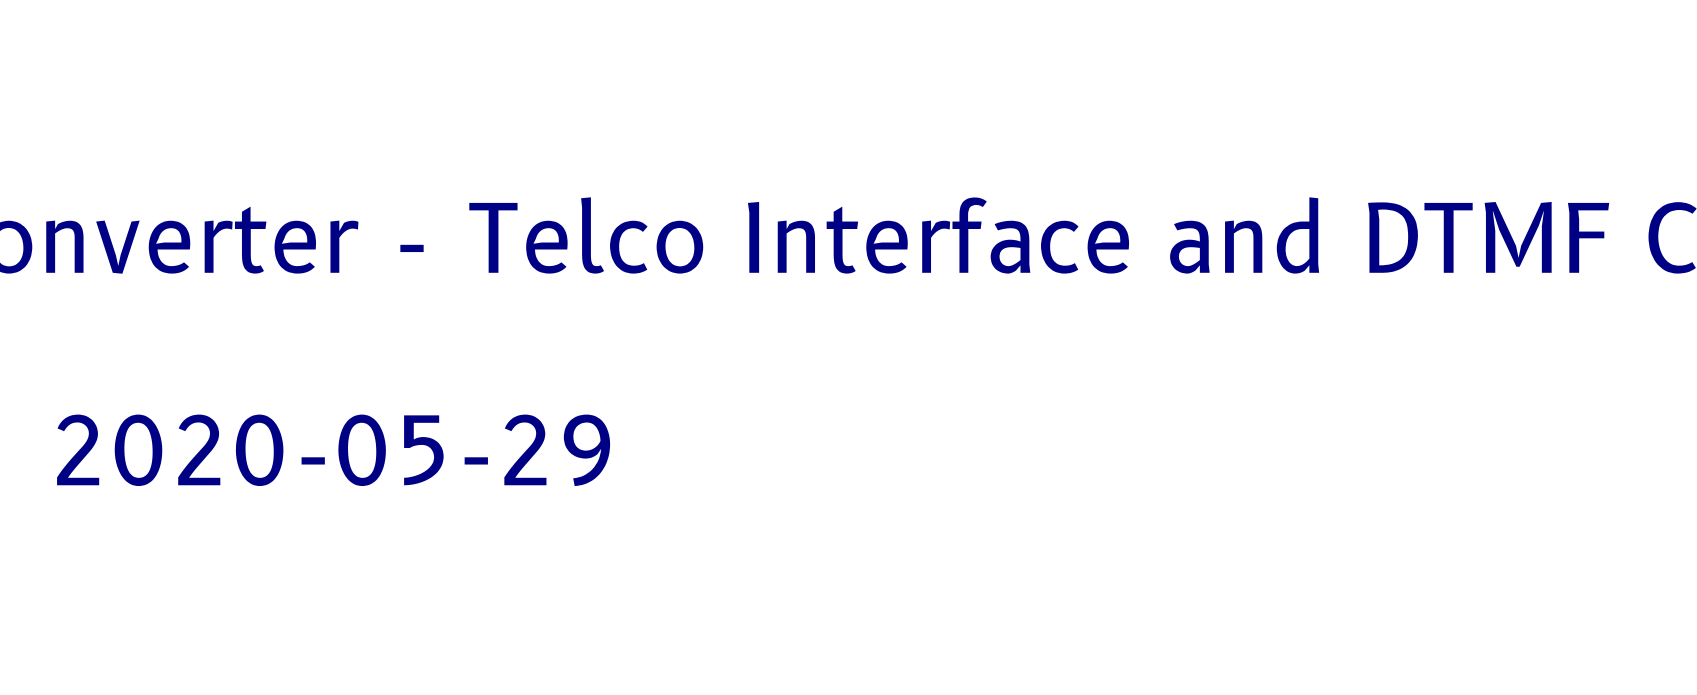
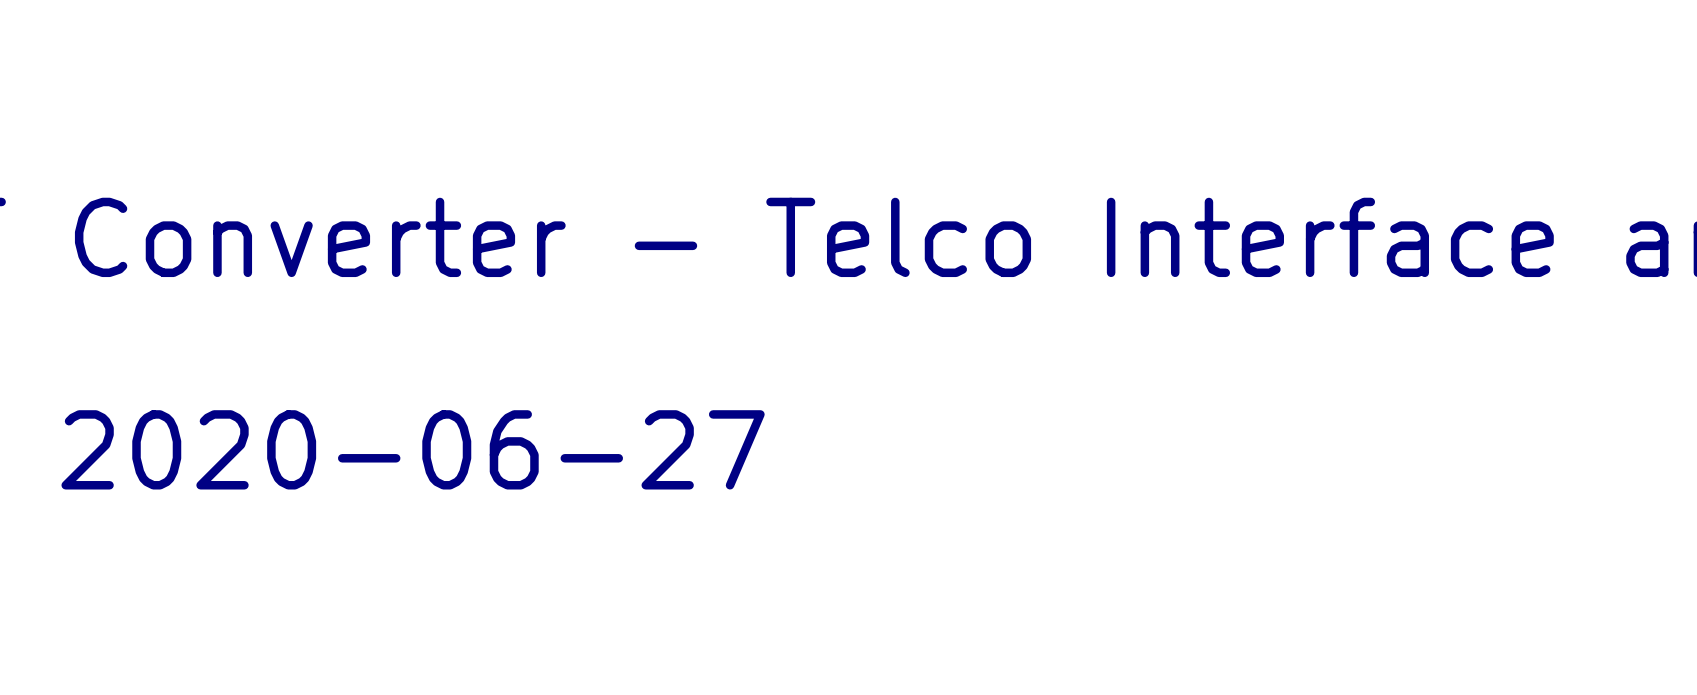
text: 2020-05-29 (333, 450) -> 2020-06-27 (413, 449)

